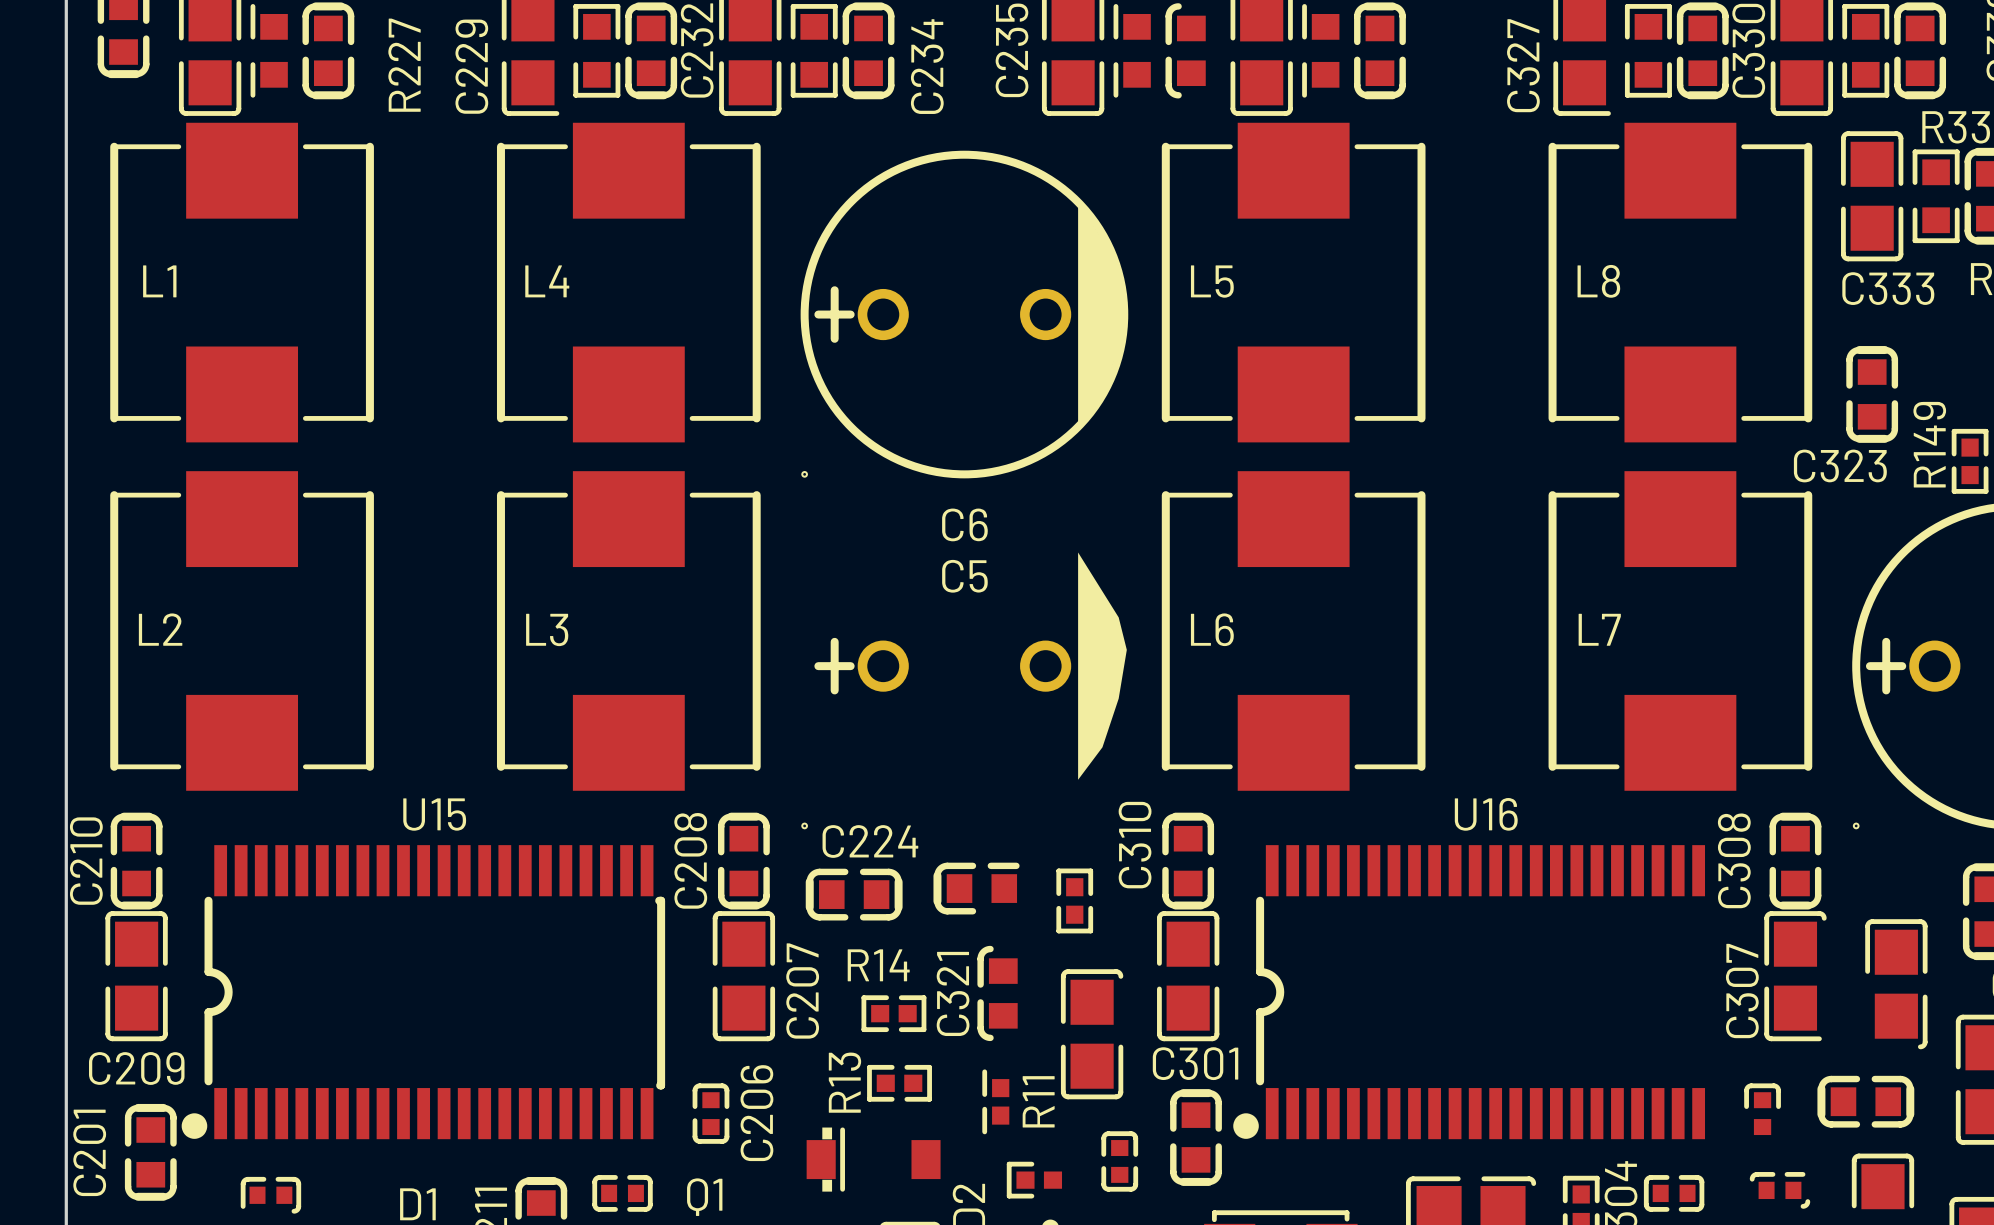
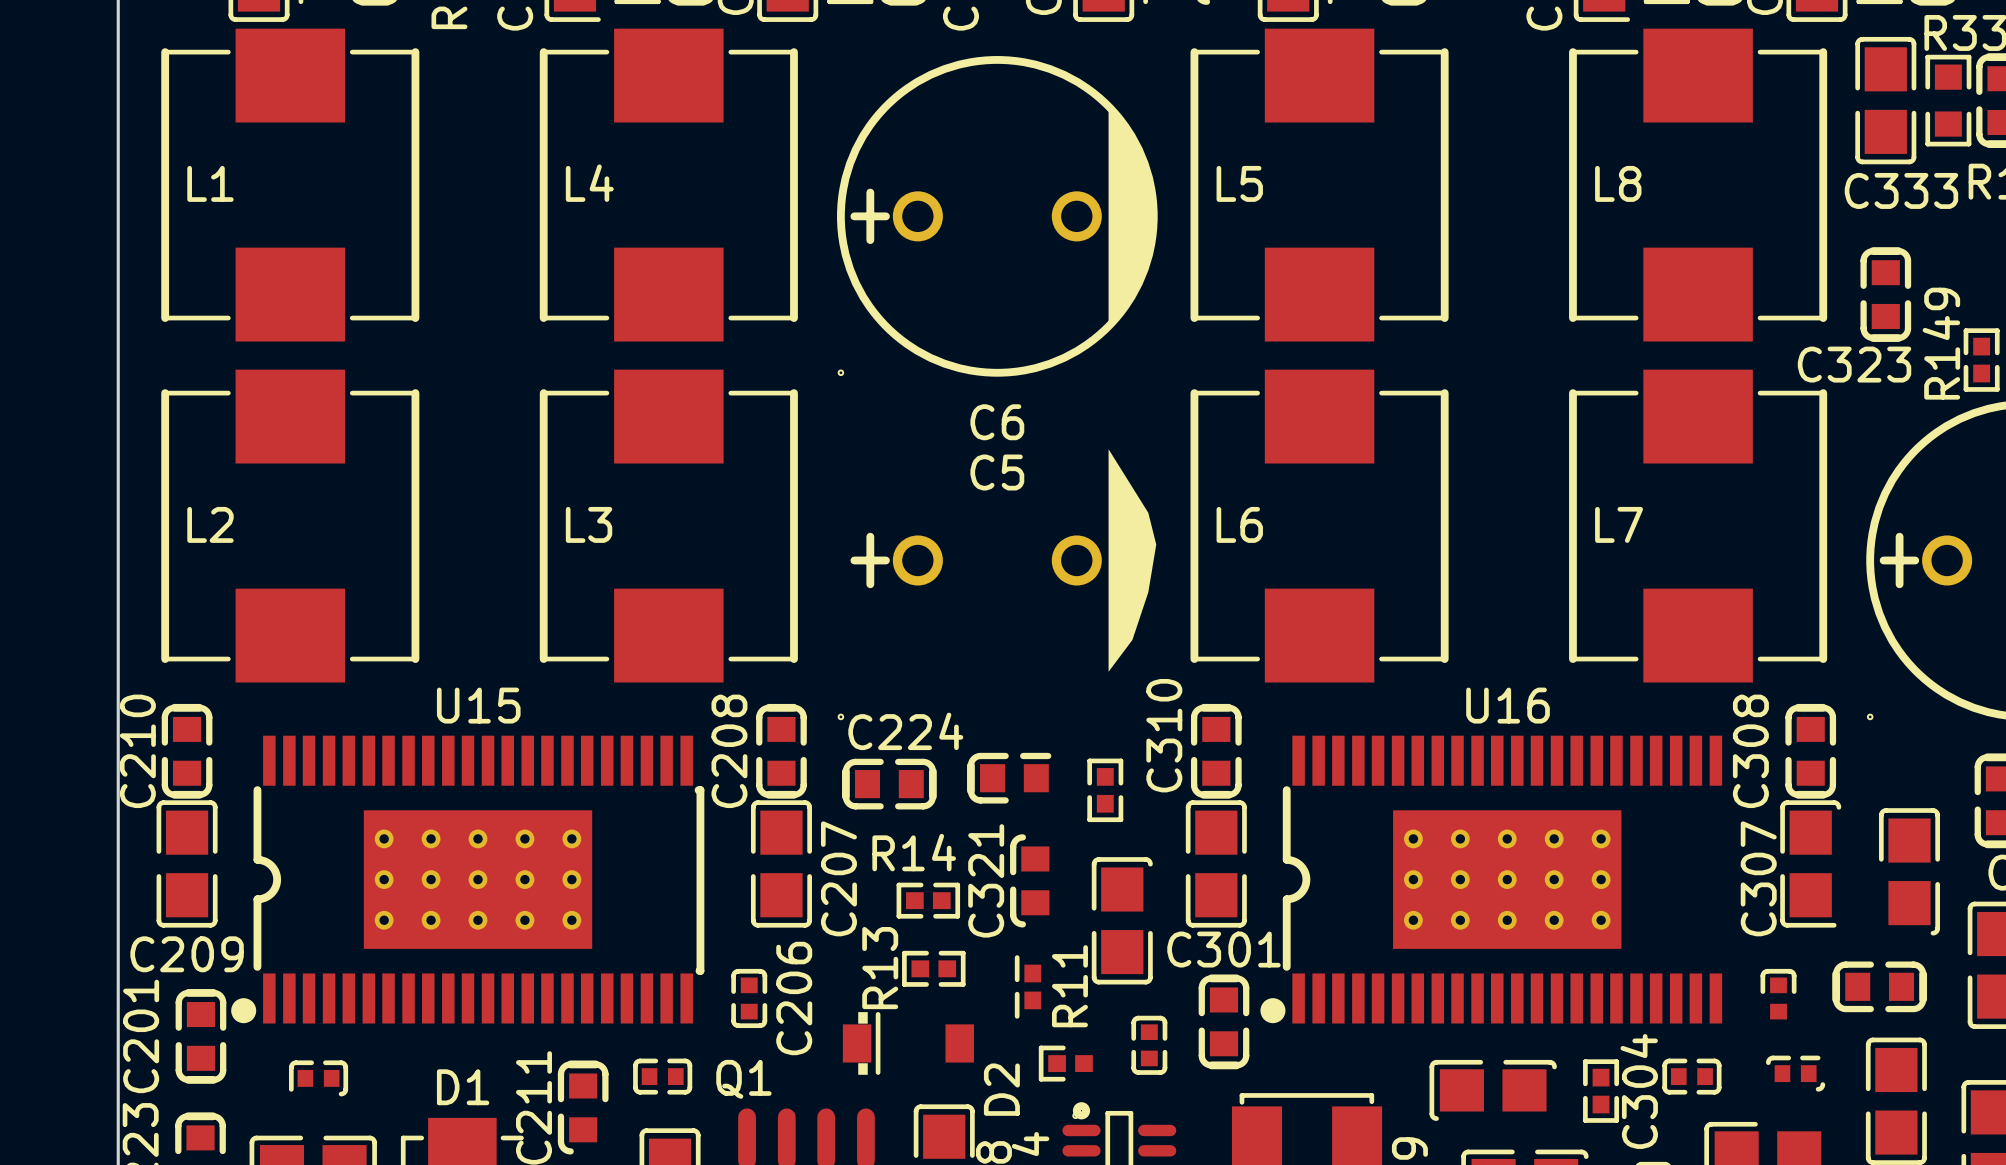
U15 footprint: [181, 845, 666, 1140] -> [231, 735, 705, 1024]
U16 footprint: [1233, 845, 1706, 1140] -> [1260, 735, 1723, 1024]

